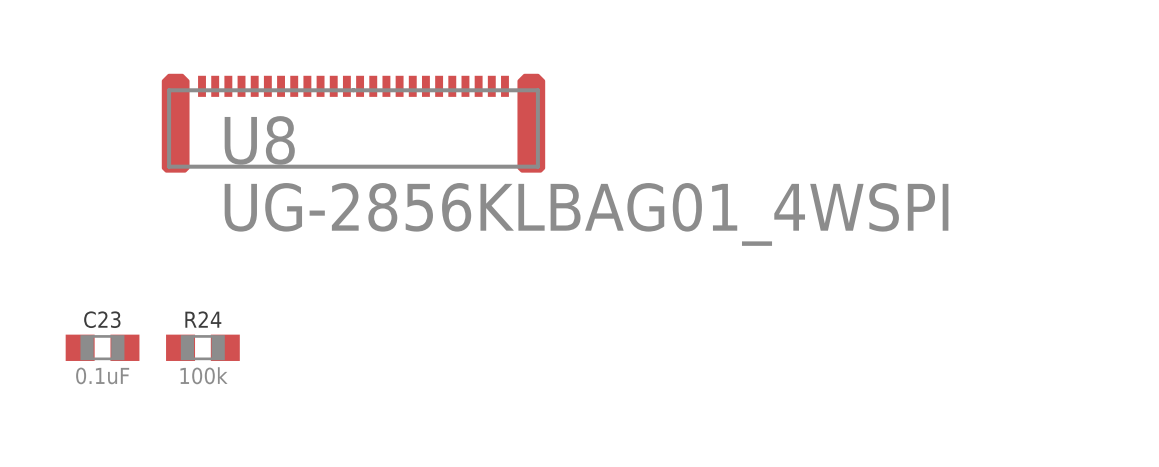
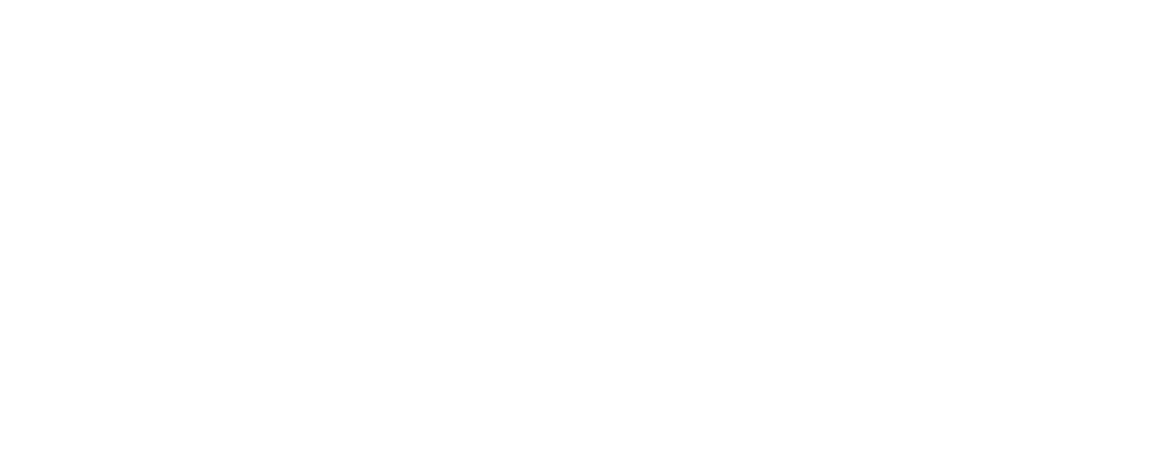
U8: UG-2856KLBAG01_4WSPI (353, 123) -> none
C23: 0.1uF (102, 347) -> none
R24: 100k (202, 347) -> none

